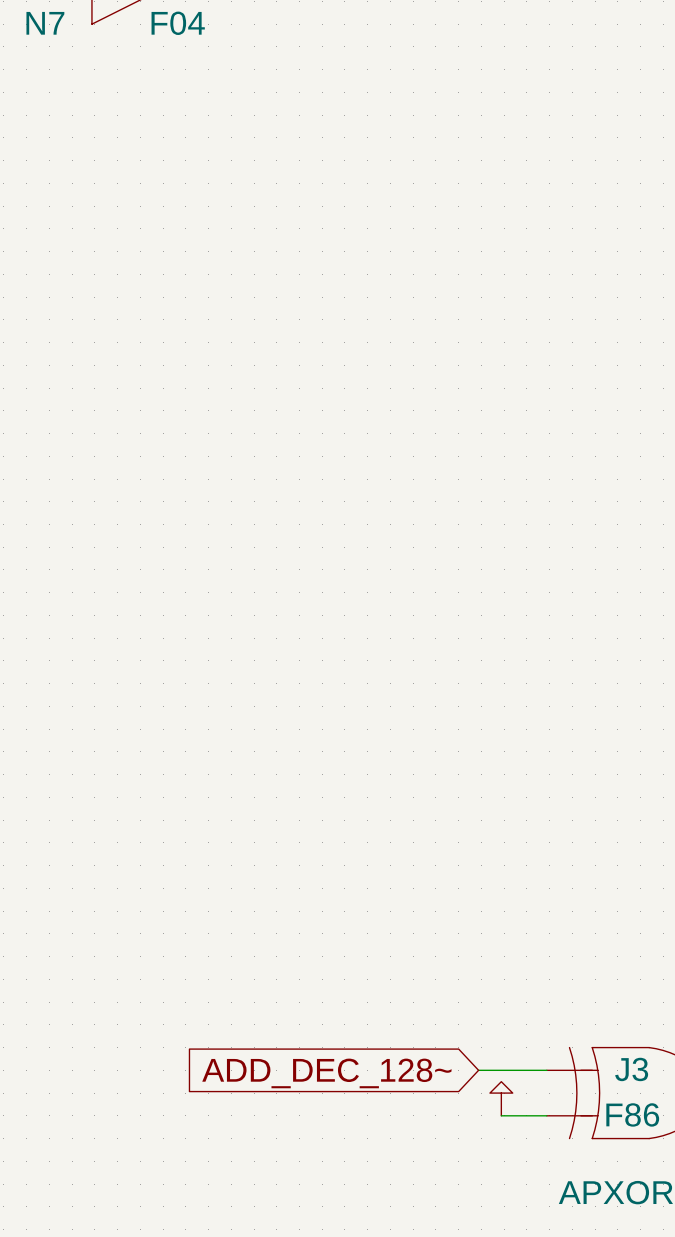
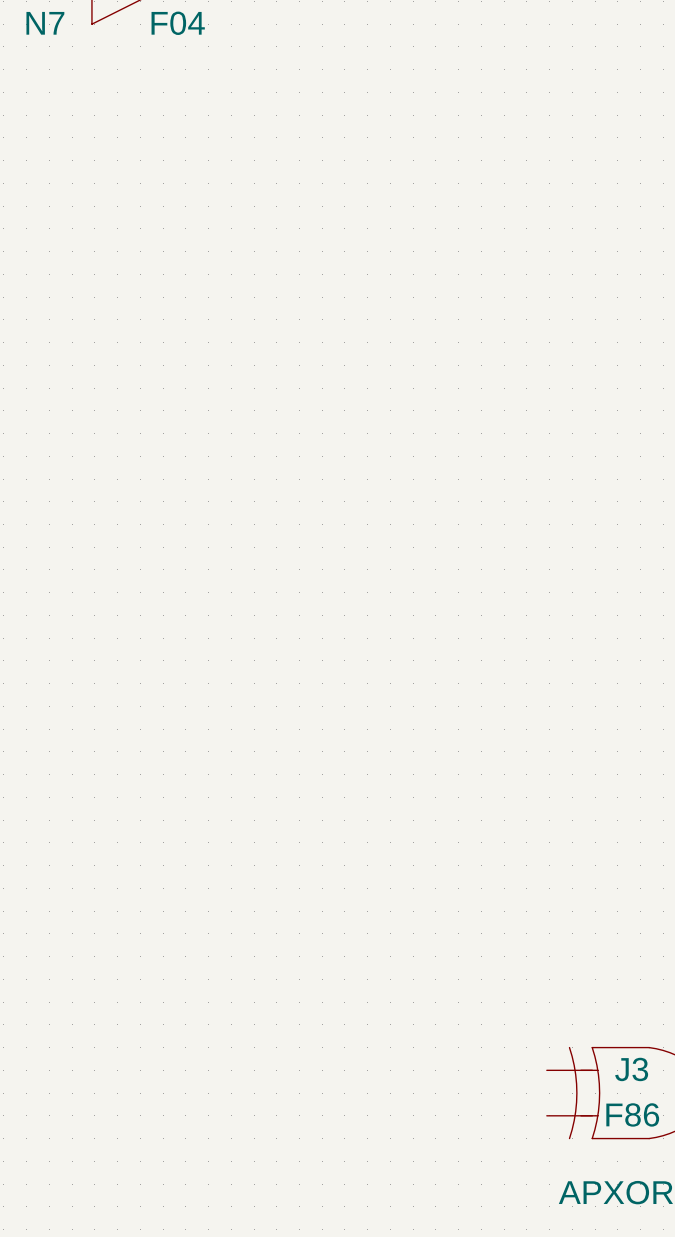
wire: (478, 1070) (546, 1070) -> none
global label: ADD_DEC_128~ (326, 1073) -> none
power symbol: (501, 1098) -> none
wire: (501, 1115) (546, 1115) -> none

